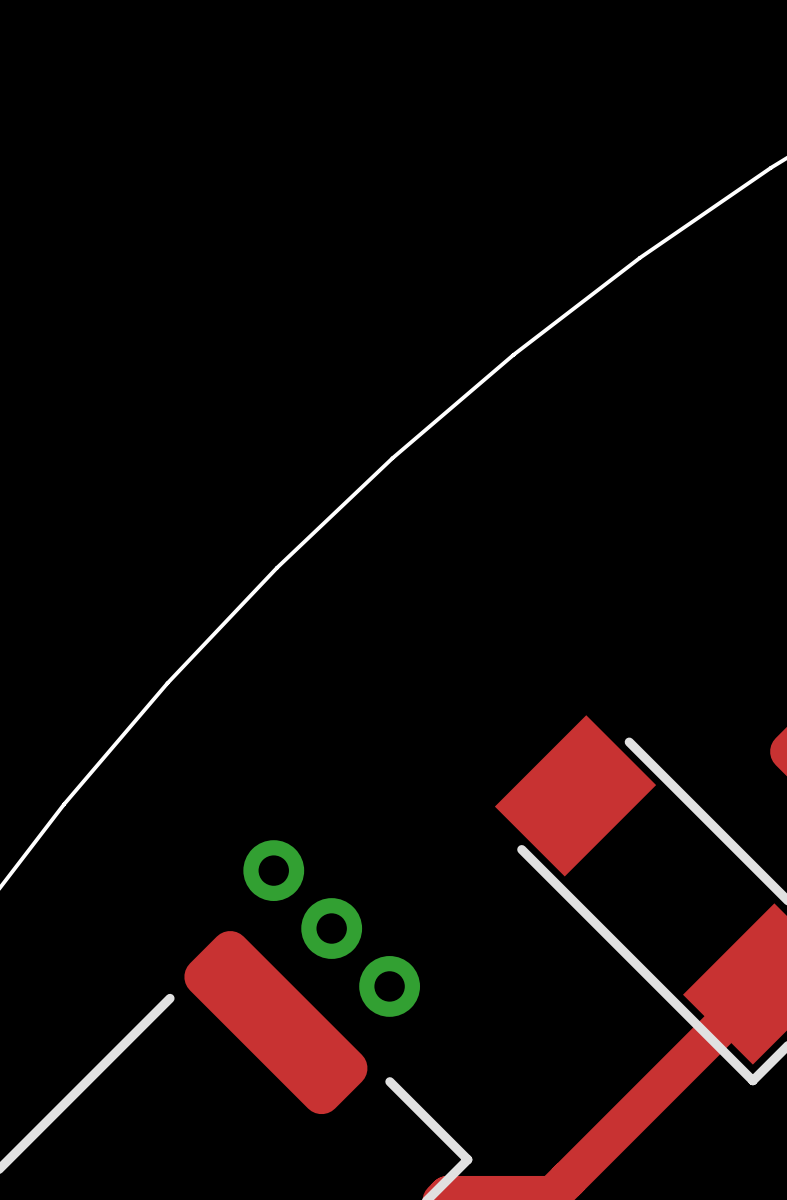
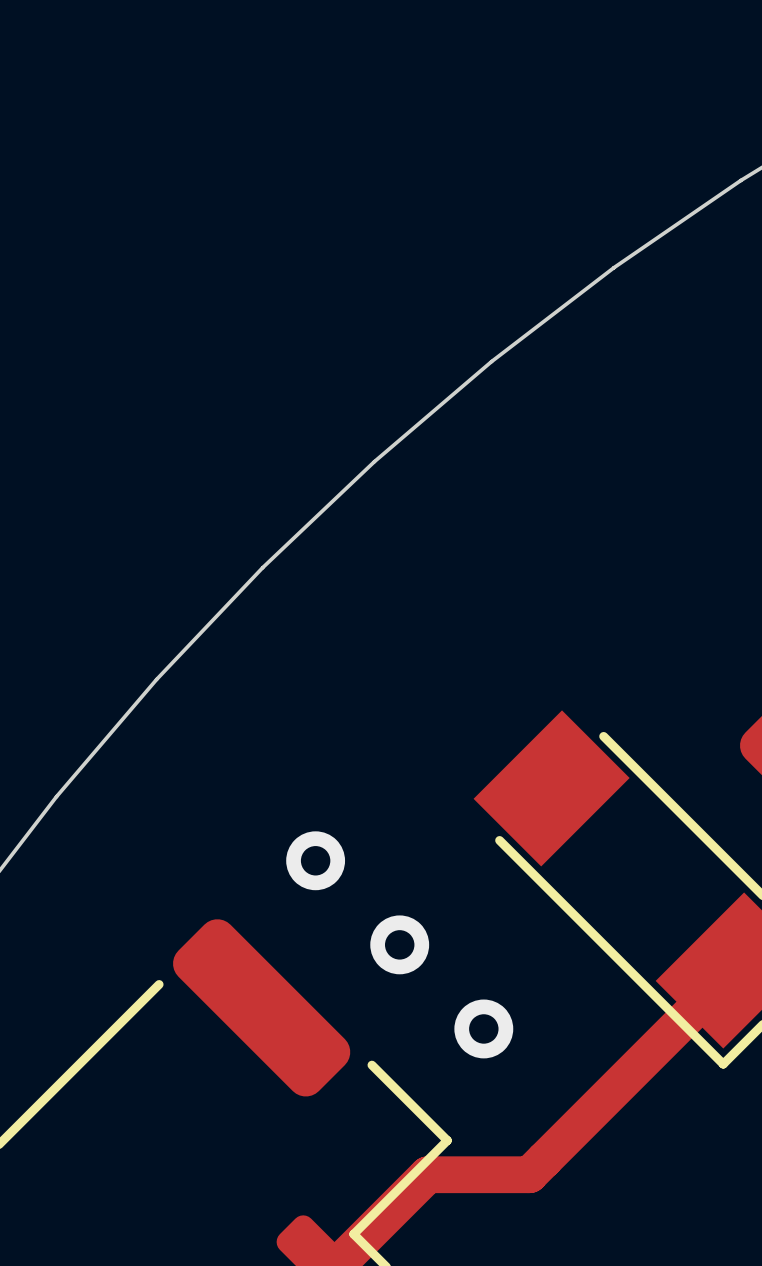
via: (273, 870) -> none
via: none -> (315, 860)
via: (331, 928) -> none
via position: (389, 986) -> (399, 944)
via: none -> (483, 1028)

